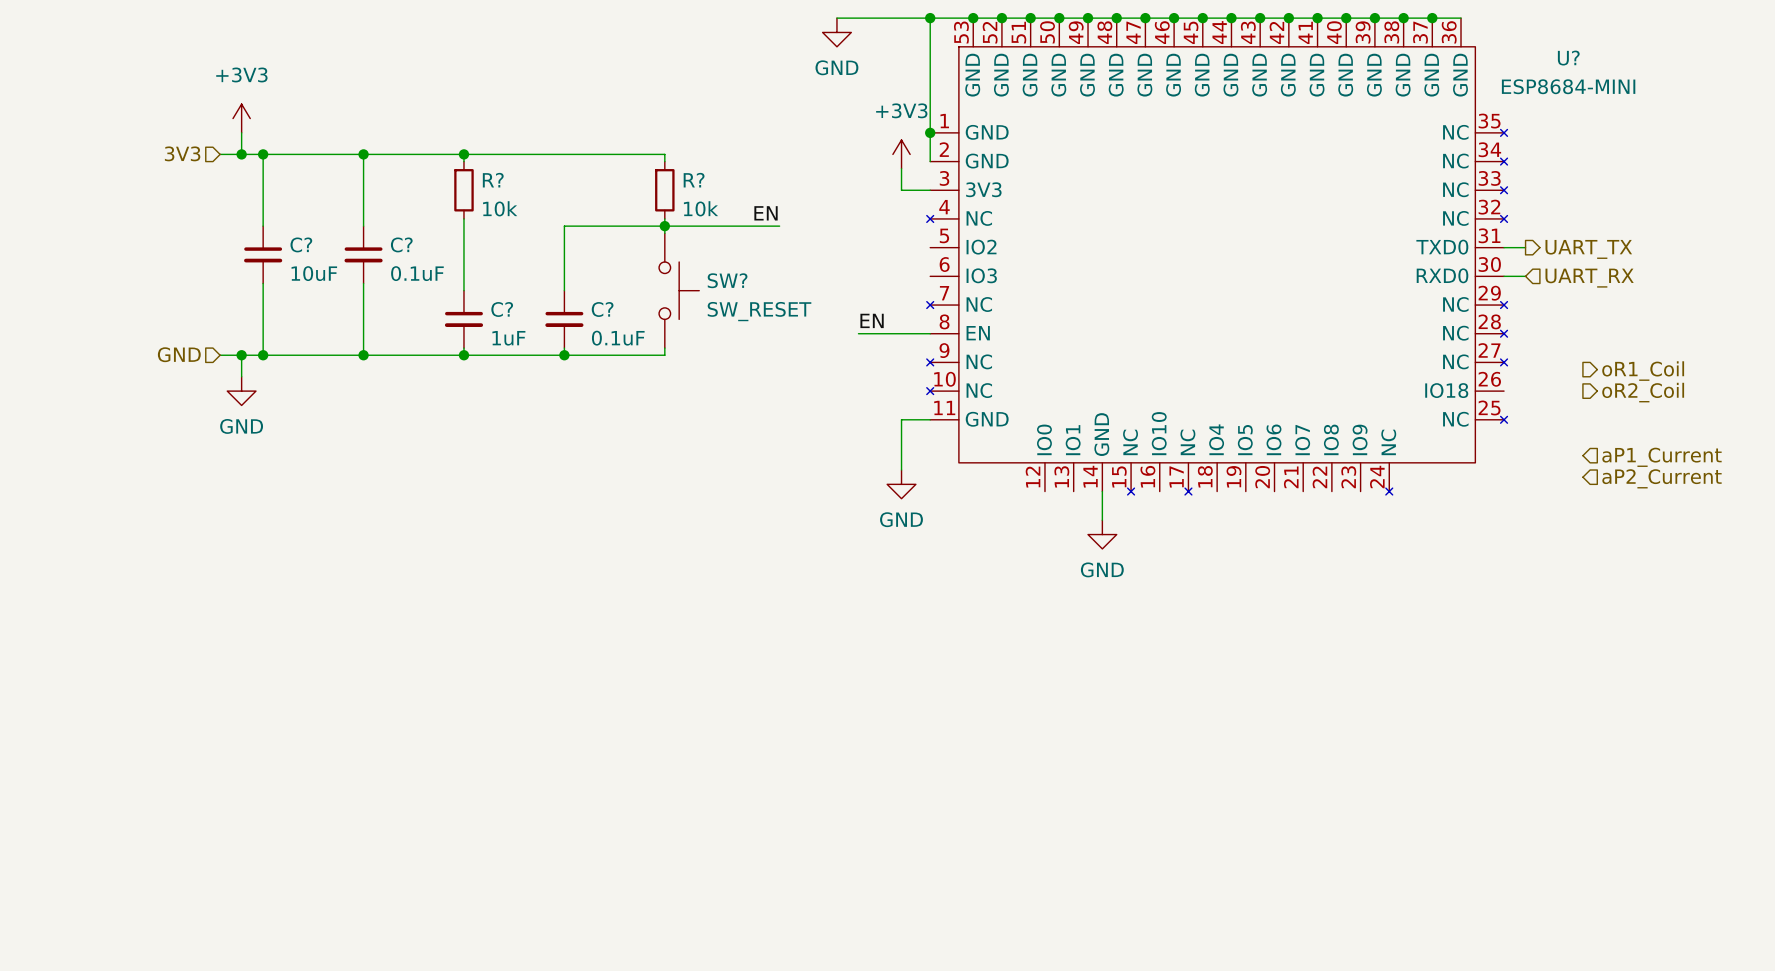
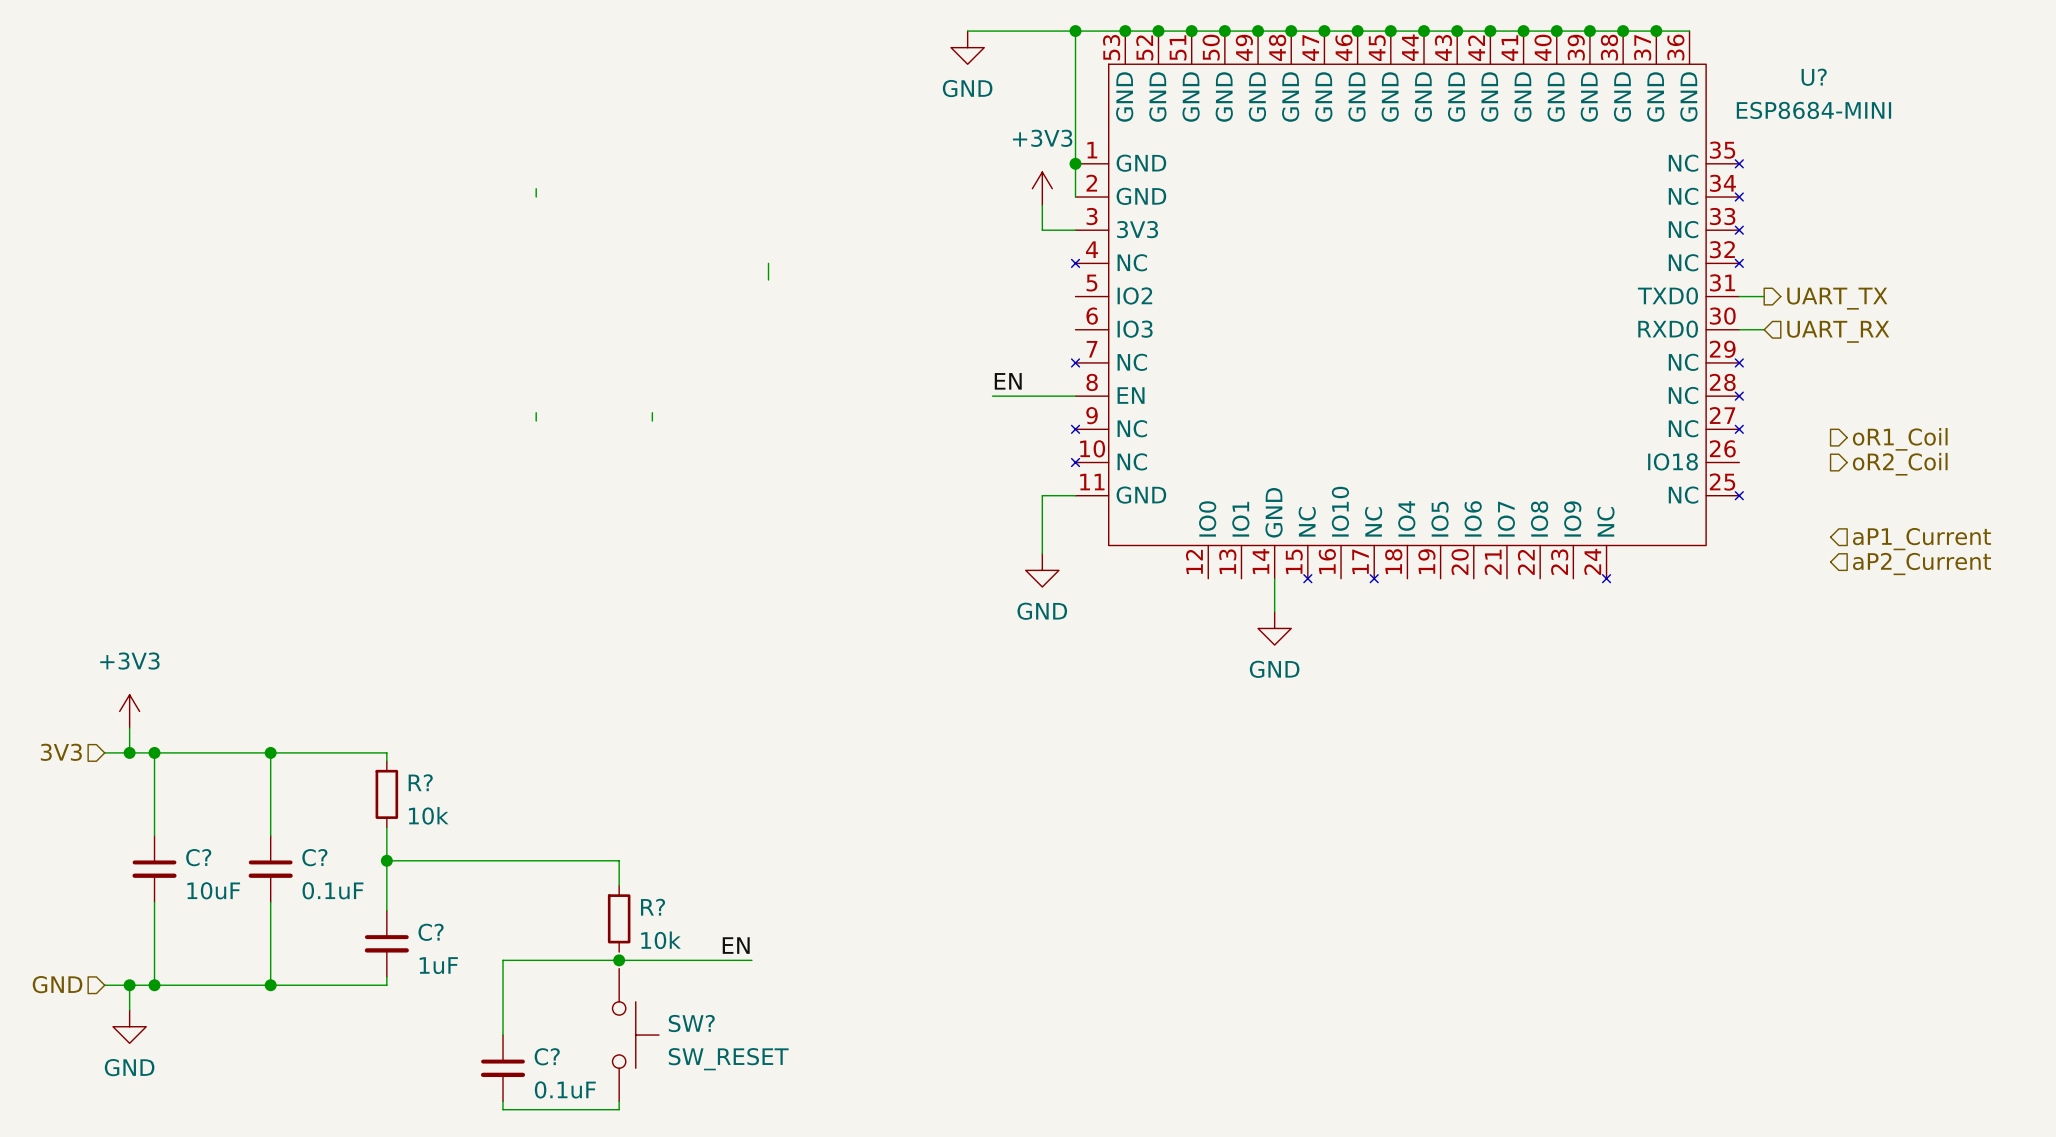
power symbol: +3V3 (241, 118) -> none
wire: (241, 132) (241, 154) -> none
hierarchical label: 3V3 (182, 153) -> none
wire: (220, 154) (664, 154) (664, 161) -> none
junction: (241, 154) -> none
wire: (263, 154) (263, 226) -> none
junction: (263, 154) -> none
wire: (363, 154) (363, 226) -> none
junction: (363, 154) -> none
junction: (463, 154) -> none
R?: 10k (463, 190) -> none
R?: 10k (664, 190) -> none
label: EN (766, 213) -> none
wire: (463, 218) (463, 290) -> none
junction: (664, 226) -> none
wire: (779, 226) (564, 226) (564, 290) -> none
C?: 10uF (263, 254) -> none
C?: 0.1uF (363, 254) -> none
wire: (263, 283) (263, 355) -> none
wire: (363, 283) (363, 355) -> none
SW?: SW_RESET (679, 290) -> none
C?: 1uF (463, 319) -> none
C?: 0.1uF (564, 319) -> none
wire: (664, 348) (664, 355) (220, 355) -> none
hierarchical label: GND (179, 354) -> none
wire: (241, 355) (241, 376) -> none
junction: (241, 355) -> none
junction: (263, 355) -> none
junction: (363, 355) -> none
junction: (463, 355) -> none
junction: (564, 355) -> none
power symbol: GND (241, 391) -> none
power symbol: none -> +3V3 (129, 711)
wire: none -> (129, 728) (129, 752)
hierarchical label: none -> 3V3 (61, 752)
wire: none -> (104, 752) (386, 752) (386, 761)
junction: none -> (129, 752)
wire: none -> (154, 752) (154, 835)
junction: none -> (154, 752)
wire: none -> (270, 752) (270, 835)
junction: none -> (270, 752)
R?: none -> 10k (386, 794)
wire: none -> (386, 827) (386, 910)
wire: none -> (386, 860) (619, 860) (619, 885)
junction: none -> (386, 860)
C?: none -> 10uF (154, 869)
C?: none -> 0.1uF (270, 869)
wire: none -> (154, 902) (154, 985)
wire: none -> (270, 902) (270, 985)
R?: none -> 10k (619, 918)
C?: none -> 1uF (386, 943)
label: none -> EN (736, 945)
junction: none -> (619, 960)
wire: none -> (751, 960) (503, 960) (503, 1035)
wire: none -> (386, 976) (386, 985) (104, 985)
hierarchical label: none -> GND (57, 984)
wire: none -> (129, 985) (129, 1010)
junction: none -> (129, 985)
junction: none -> (154, 985)
junction: none -> (270, 985)
power symbol: none -> GND (129, 1026)
SW?: none -> SW_RESET (635, 1035)
C?: none -> 0.1uF (503, 1068)
wire: none -> (503, 1101) (503, 1109) (619, 1109) (619, 1101)

